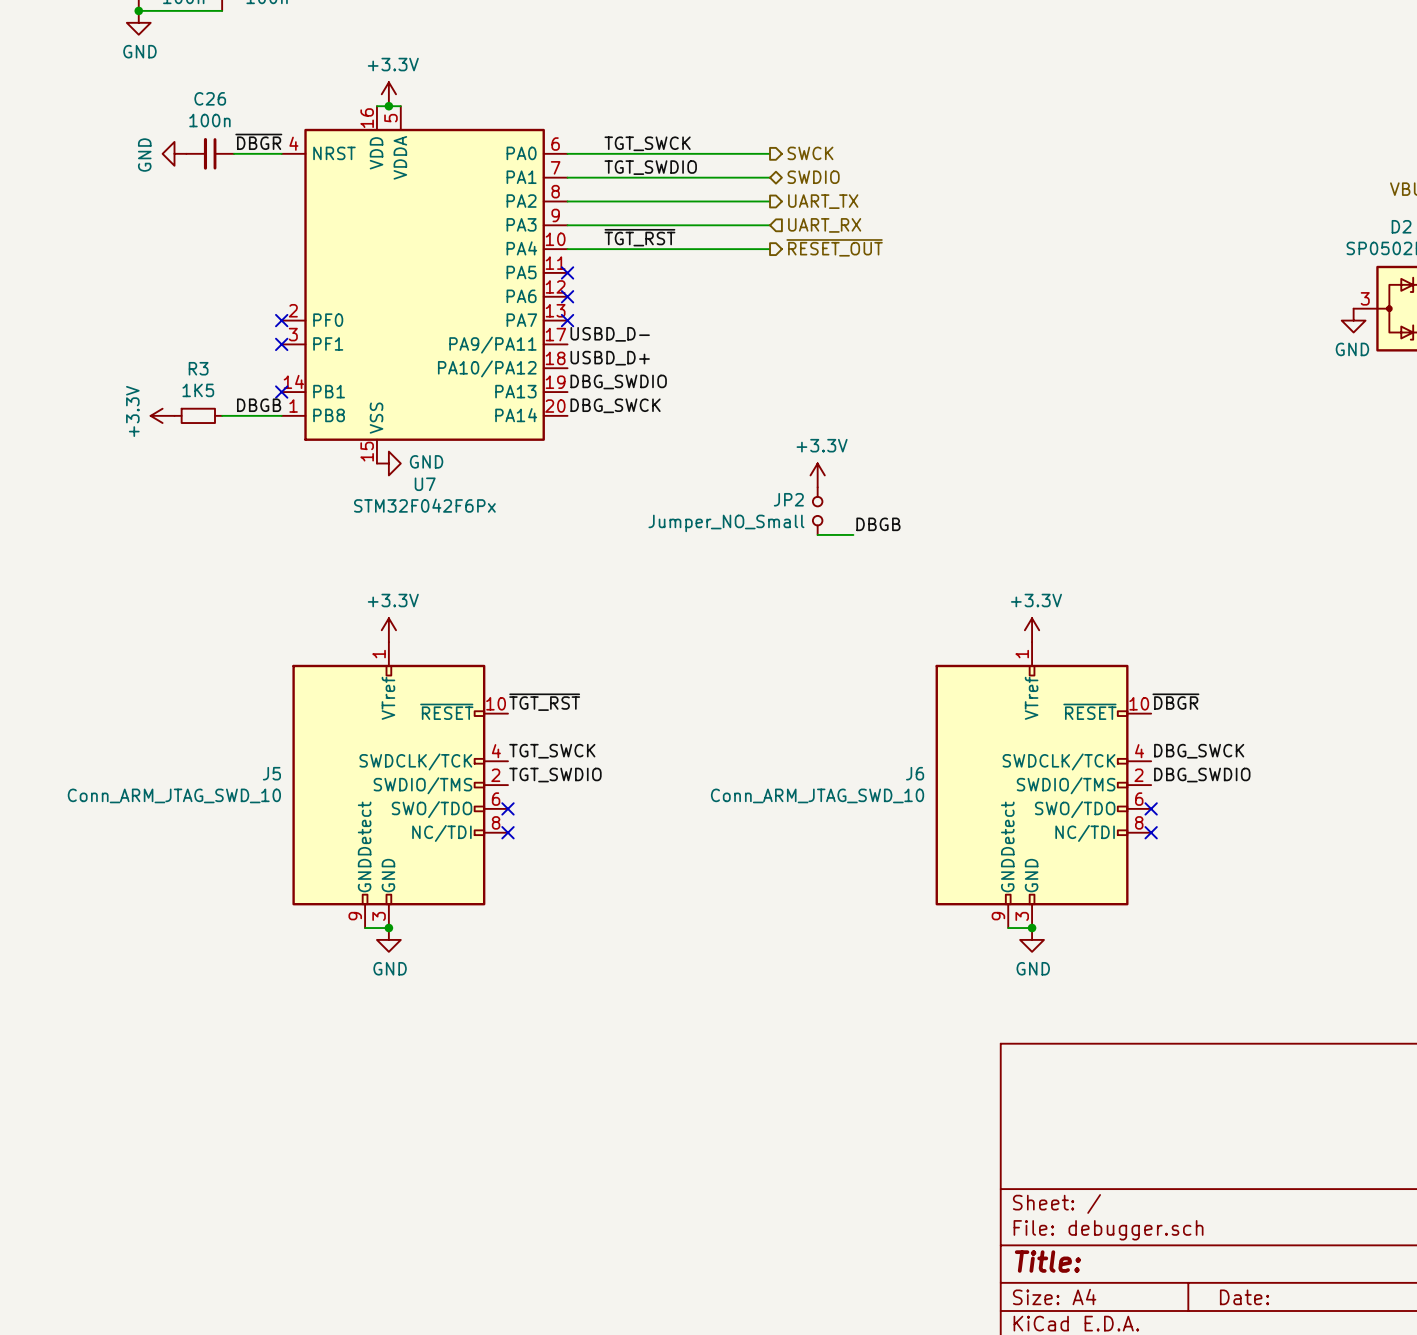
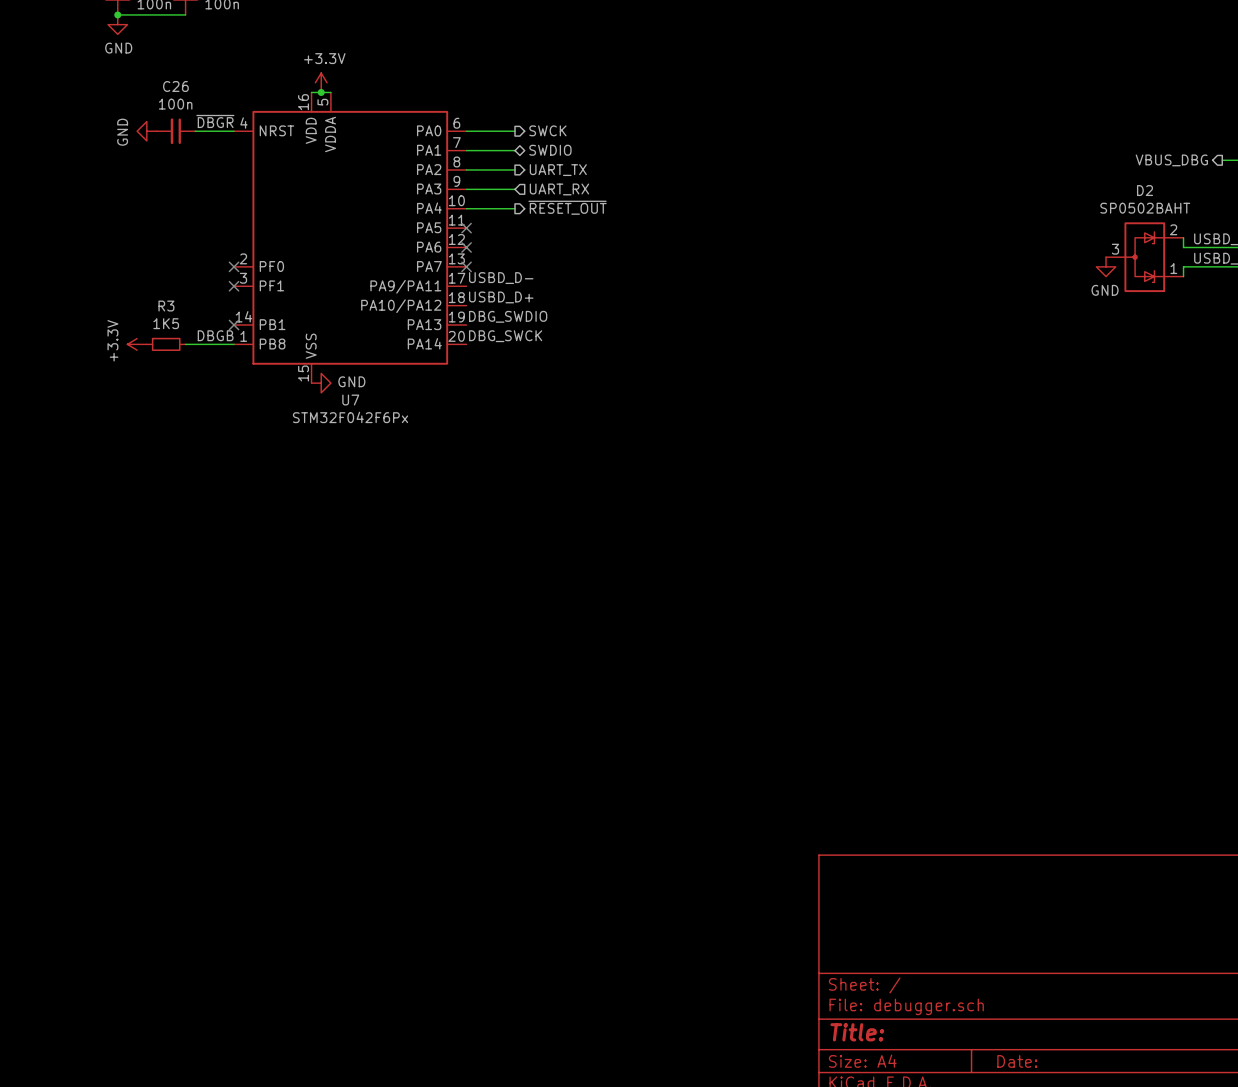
label: TGT_SWCK (647, 143) -> none
wire: (627, 153) (770, 153) -> none
hierarchical label position: SWCK (810, 153) -> SWCK (547, 130)
label: TGT_SWDIO (650, 167) -> none
wire: (627, 177) (770, 177) -> none
hierarchical label position: SWDIO (813, 177) -> SWDIO (550, 150)
wire: (627, 201) (770, 201) -> none
hierarchical label position: UART_TX (823, 201) -> UART_TX (558, 170)
wire: (627, 225) (770, 225) -> none
hierarchical label position: UART_RX (824, 225) -> UART_RX (559, 189)
label: ~{TGT_RST} (639, 237) -> none
hierarchical label position: ~{RESET_OUT} (834, 247) -> ~{RESET_OUT} (567, 207)
wire: (627, 249) (770, 249) -> none
power symbol: +3.3V (817, 475) -> none
JP2: Jumper_NO_Small (817, 511) -> none
label: DBGB (878, 524) -> none
wire: (817, 534) (853, 534) -> none
power symbol: +3.3V (388, 630) -> none
power symbol: +3.3V (1032, 630) -> none
label: ~{DBGR} (1175, 701) -> none
label: ~{TGT_RST} (544, 702) -> none
label: TGT_SWCK (552, 751) -> none
label: DBG_SWCK (1199, 751) -> none
label: TGT_SWDIO (555, 775) -> none
label: DBG_SWDIO (1202, 775) -> none
J5: Conn_ARM_JTAG_SWD_10 (400, 785) -> none
J6: Conn_ARM_JTAG_SWD_10 (1043, 785) -> none
no-connect mark: (507, 808) -> none
no-connect mark: (1151, 808) -> none
no-connect mark: (507, 832) -> none
no-connect mark: (1151, 832) -> none
wire: (365, 928) (388, 928) -> none
junction: (388, 928) -> none
wire: (1008, 928) (1032, 928) -> none
junction: (1032, 928) -> none
power symbol: GND (388, 939) -> none
power symbol: GND (1032, 939) -> none

